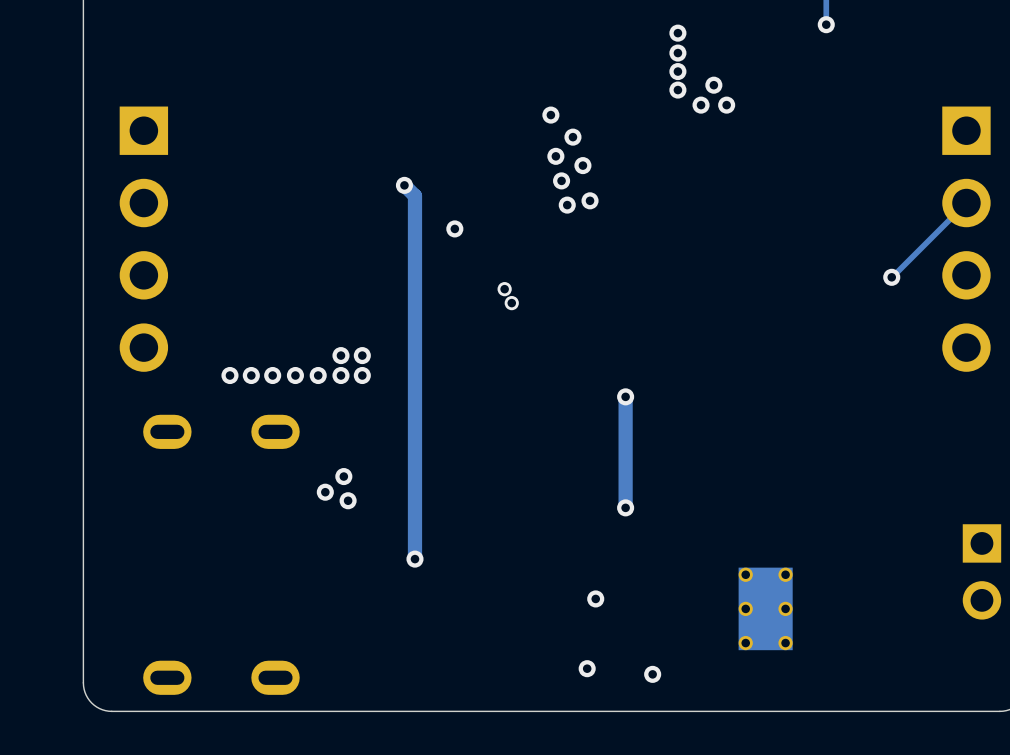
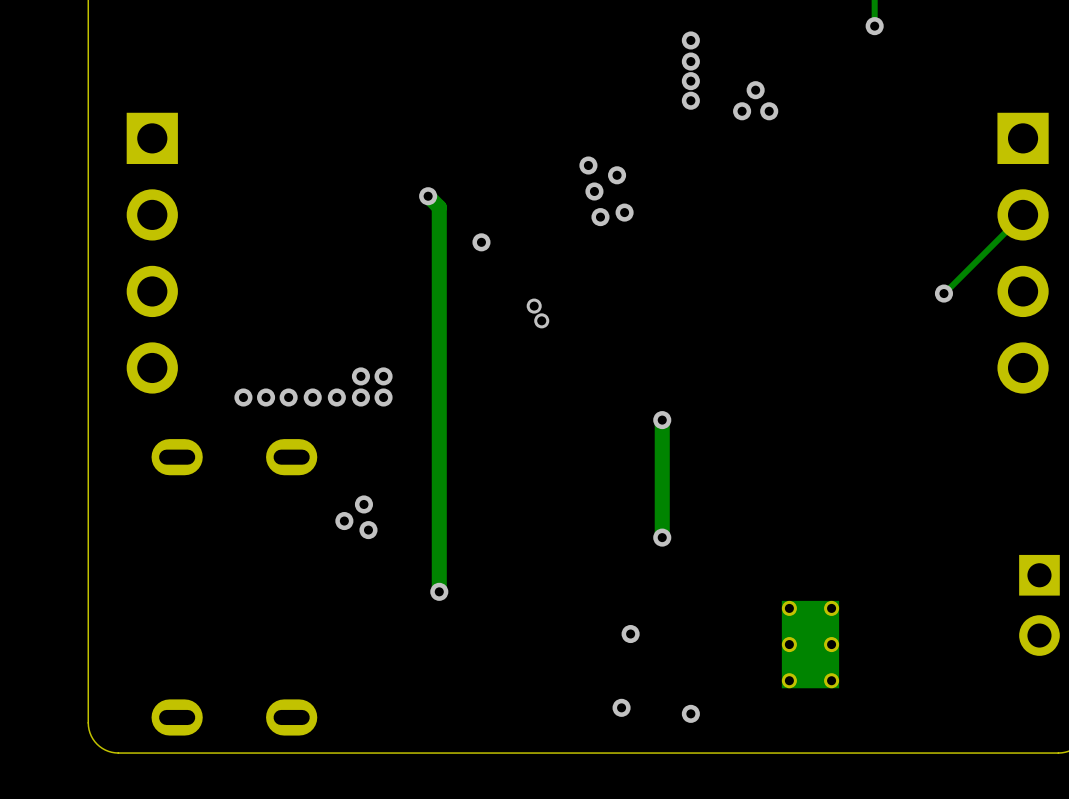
via: (677, 33) -> none
via: none -> (690, 40)
via: (677, 53) -> none
via: none -> (690, 61)
via: (677, 71) -> none
via: none -> (690, 81)
via: (677, 90) -> none
via: none -> (690, 100)
via: (550, 115) -> none
via: (572, 137) -> none

